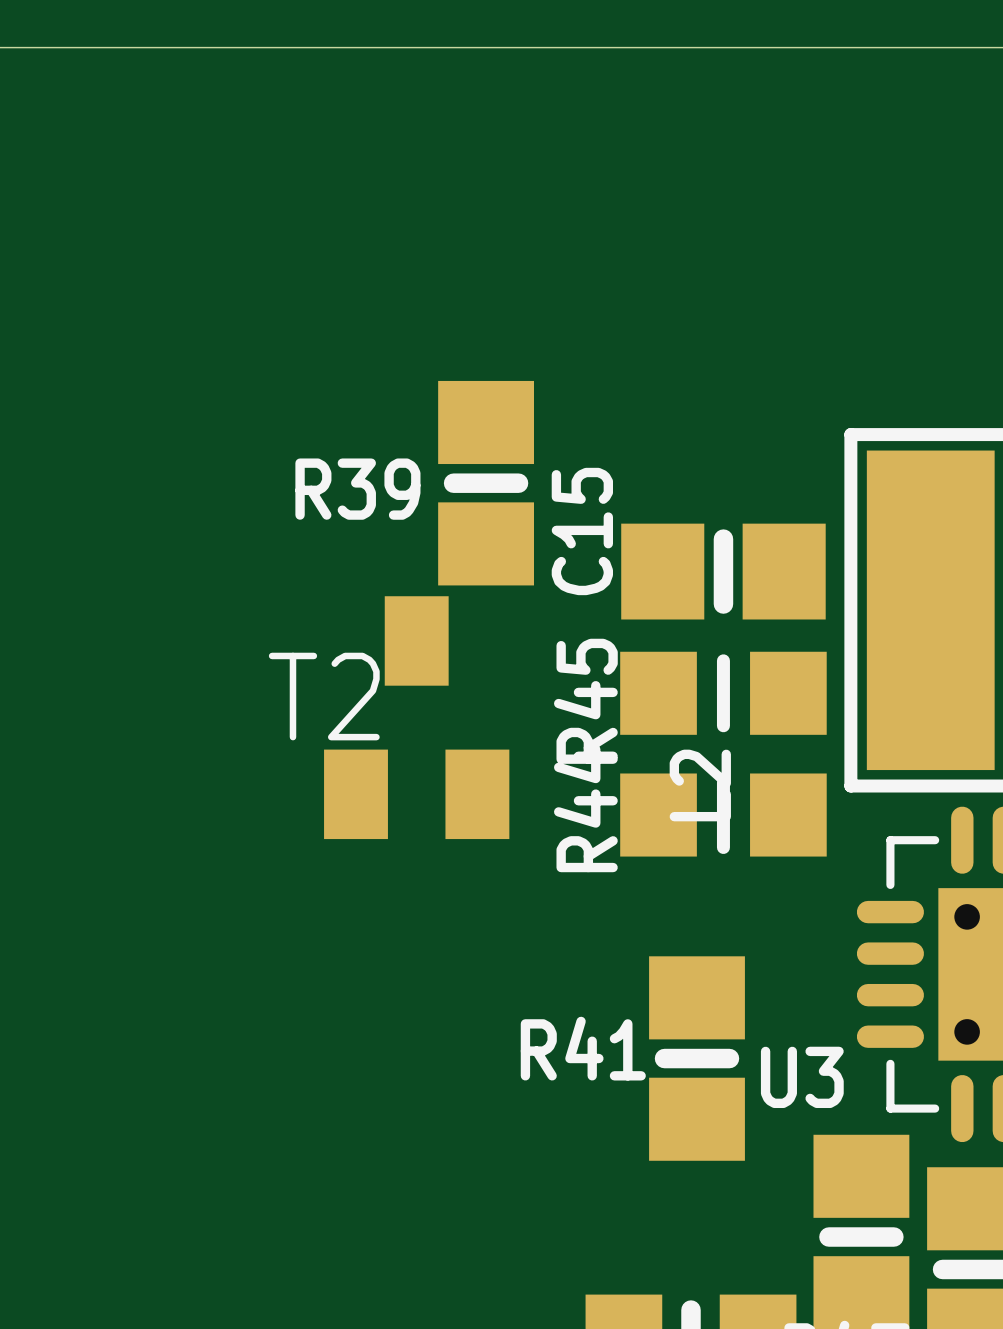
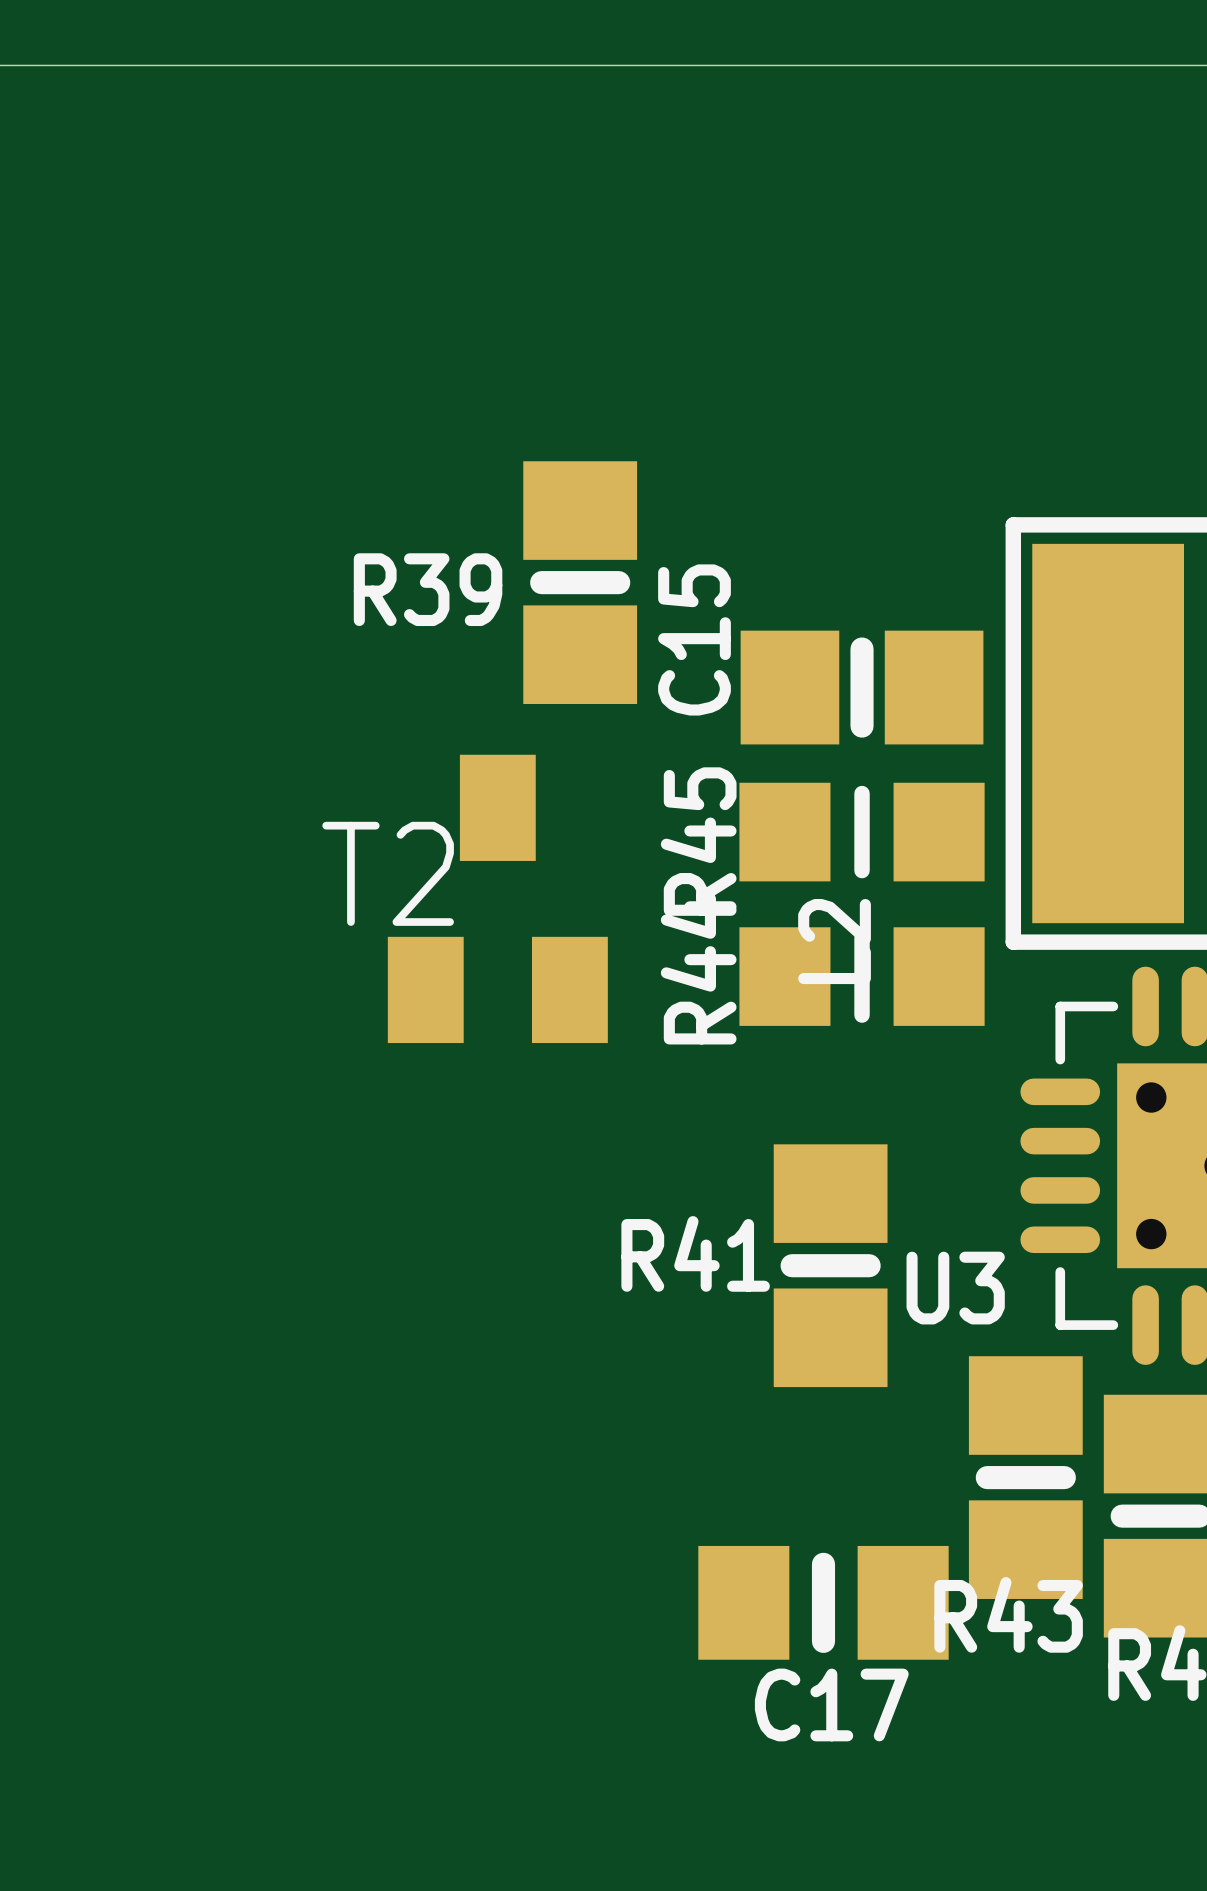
T2 position: (416, 717) -> (497, 898)

